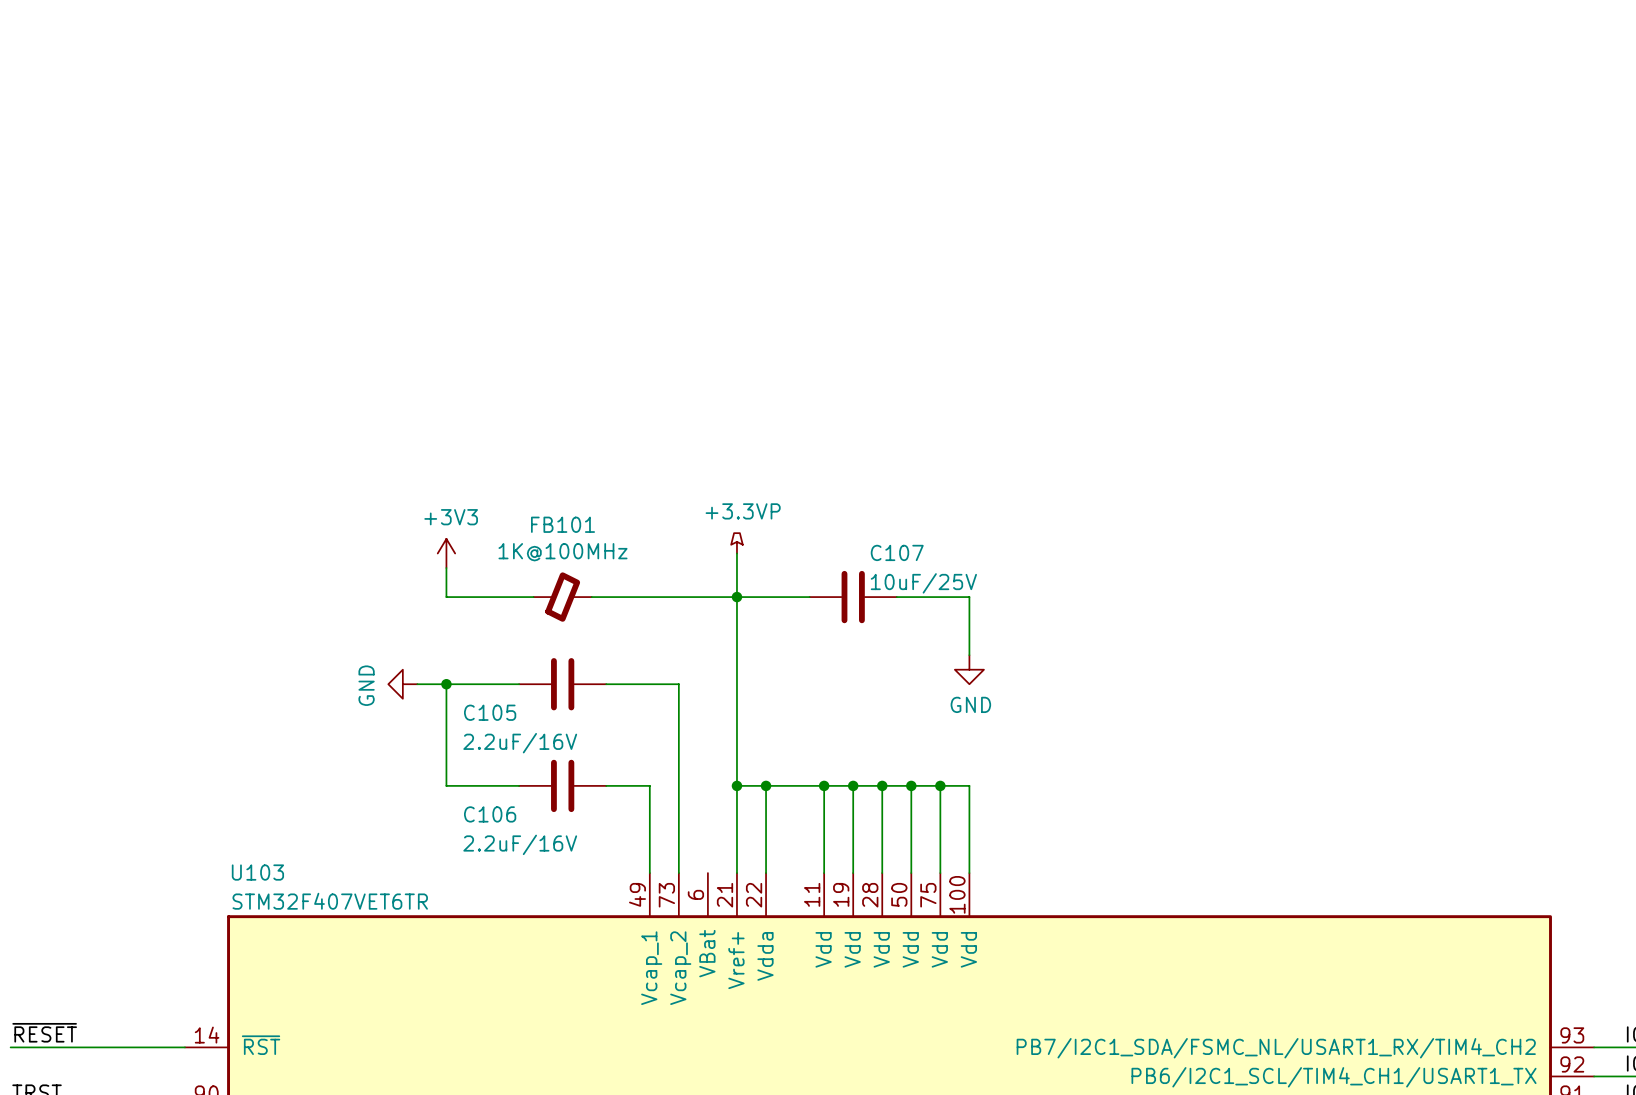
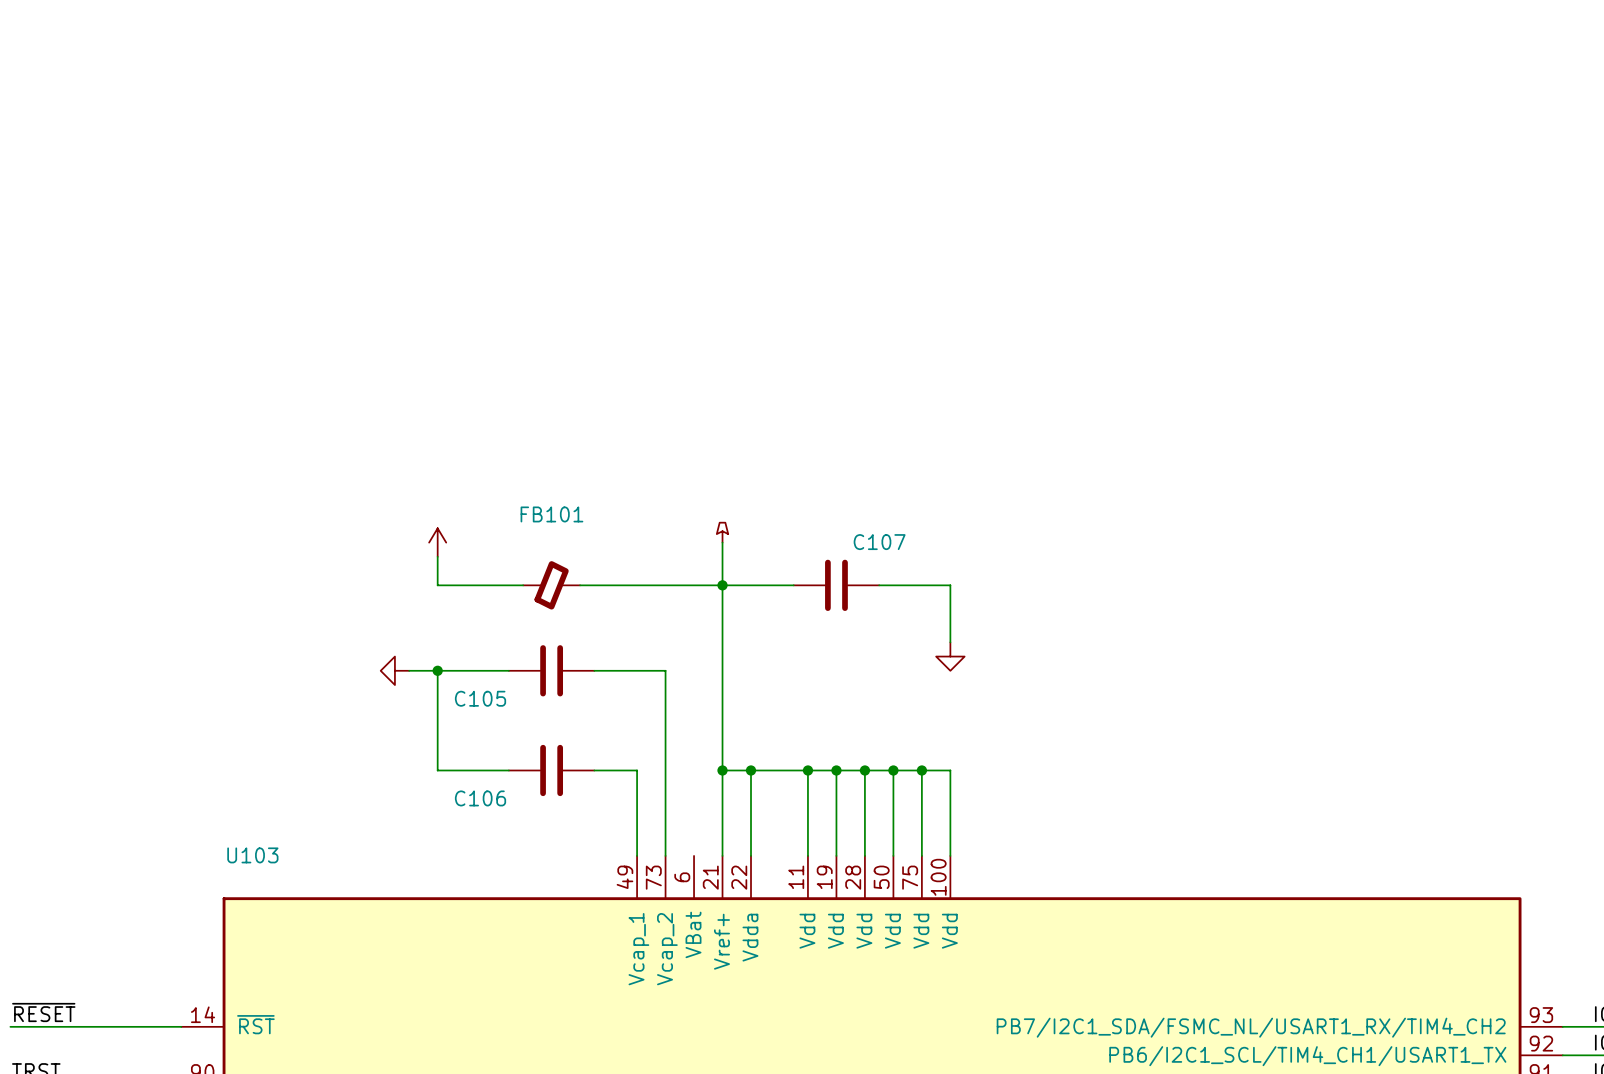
power symbol text: +3.3VP (743, 511) -> none
power symbol text: +3V3 (451, 517) -> none
FB101 value: 1K@100MHz (563, 552) -> none
C107 value: 10uF/25V (923, 583) -> none
power symbol text: GND (366, 685) -> none
power symbol text: GND (970, 704) -> none
C105 value: 2.2uF/16V (520, 743) -> none
C106 value: 2.2uF/16V (520, 844) -> none
U103 value: STM32F407VET6TR (330, 901) -> none

